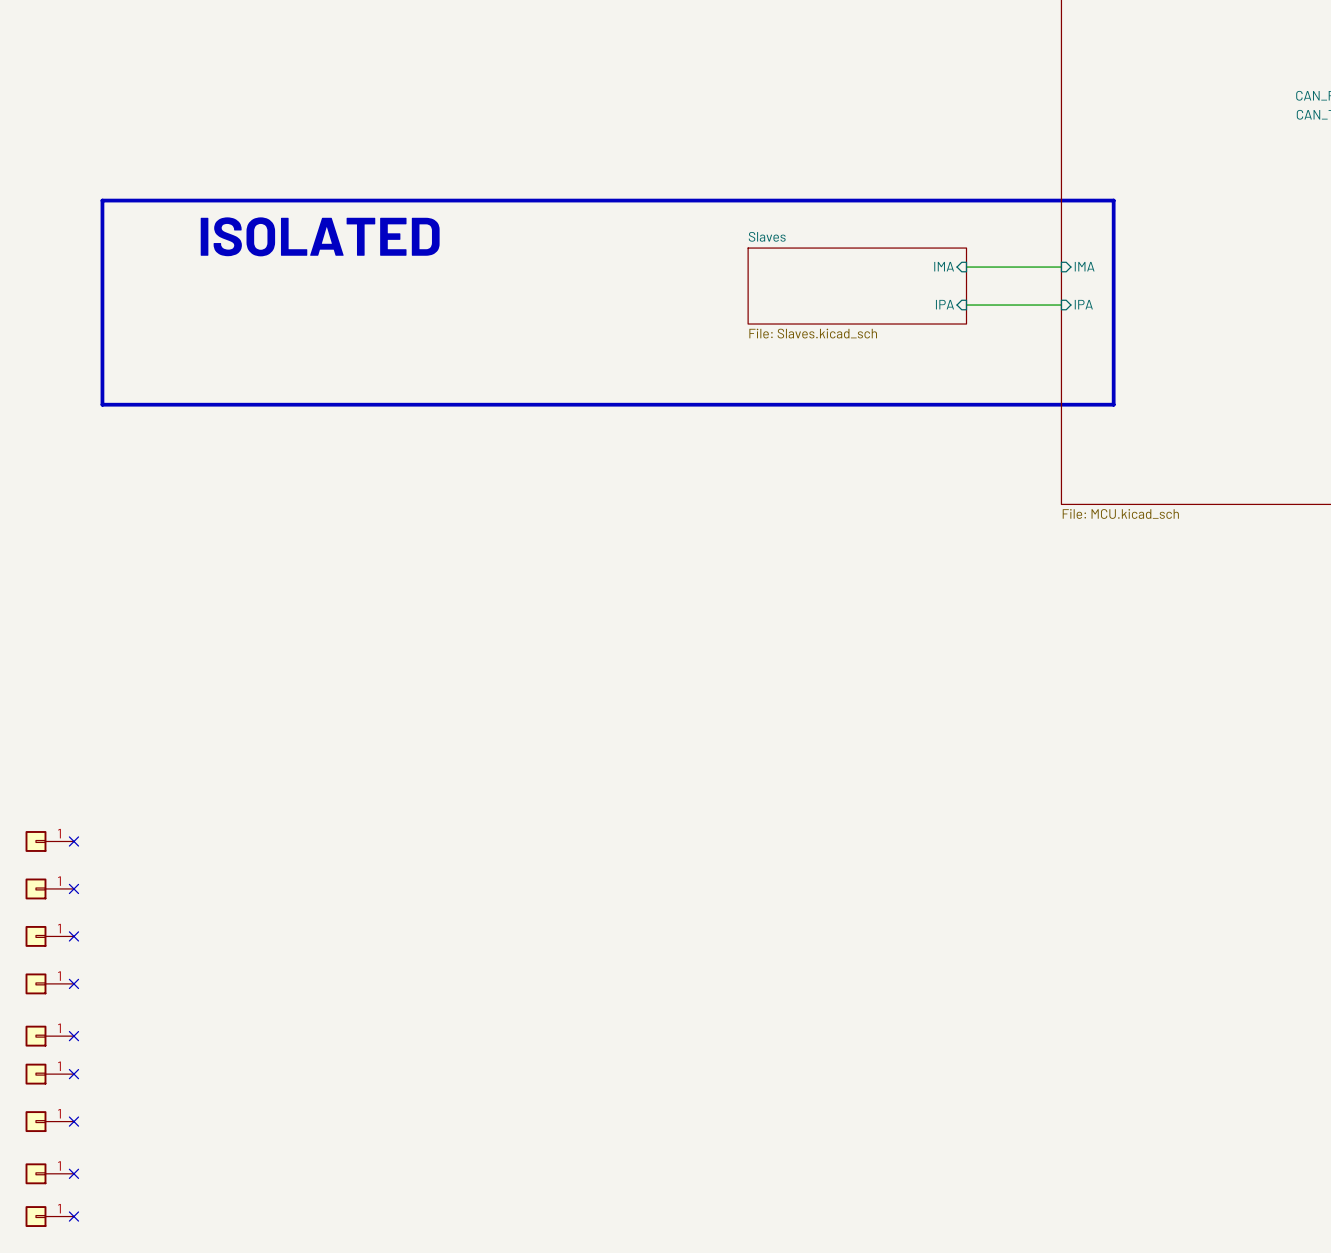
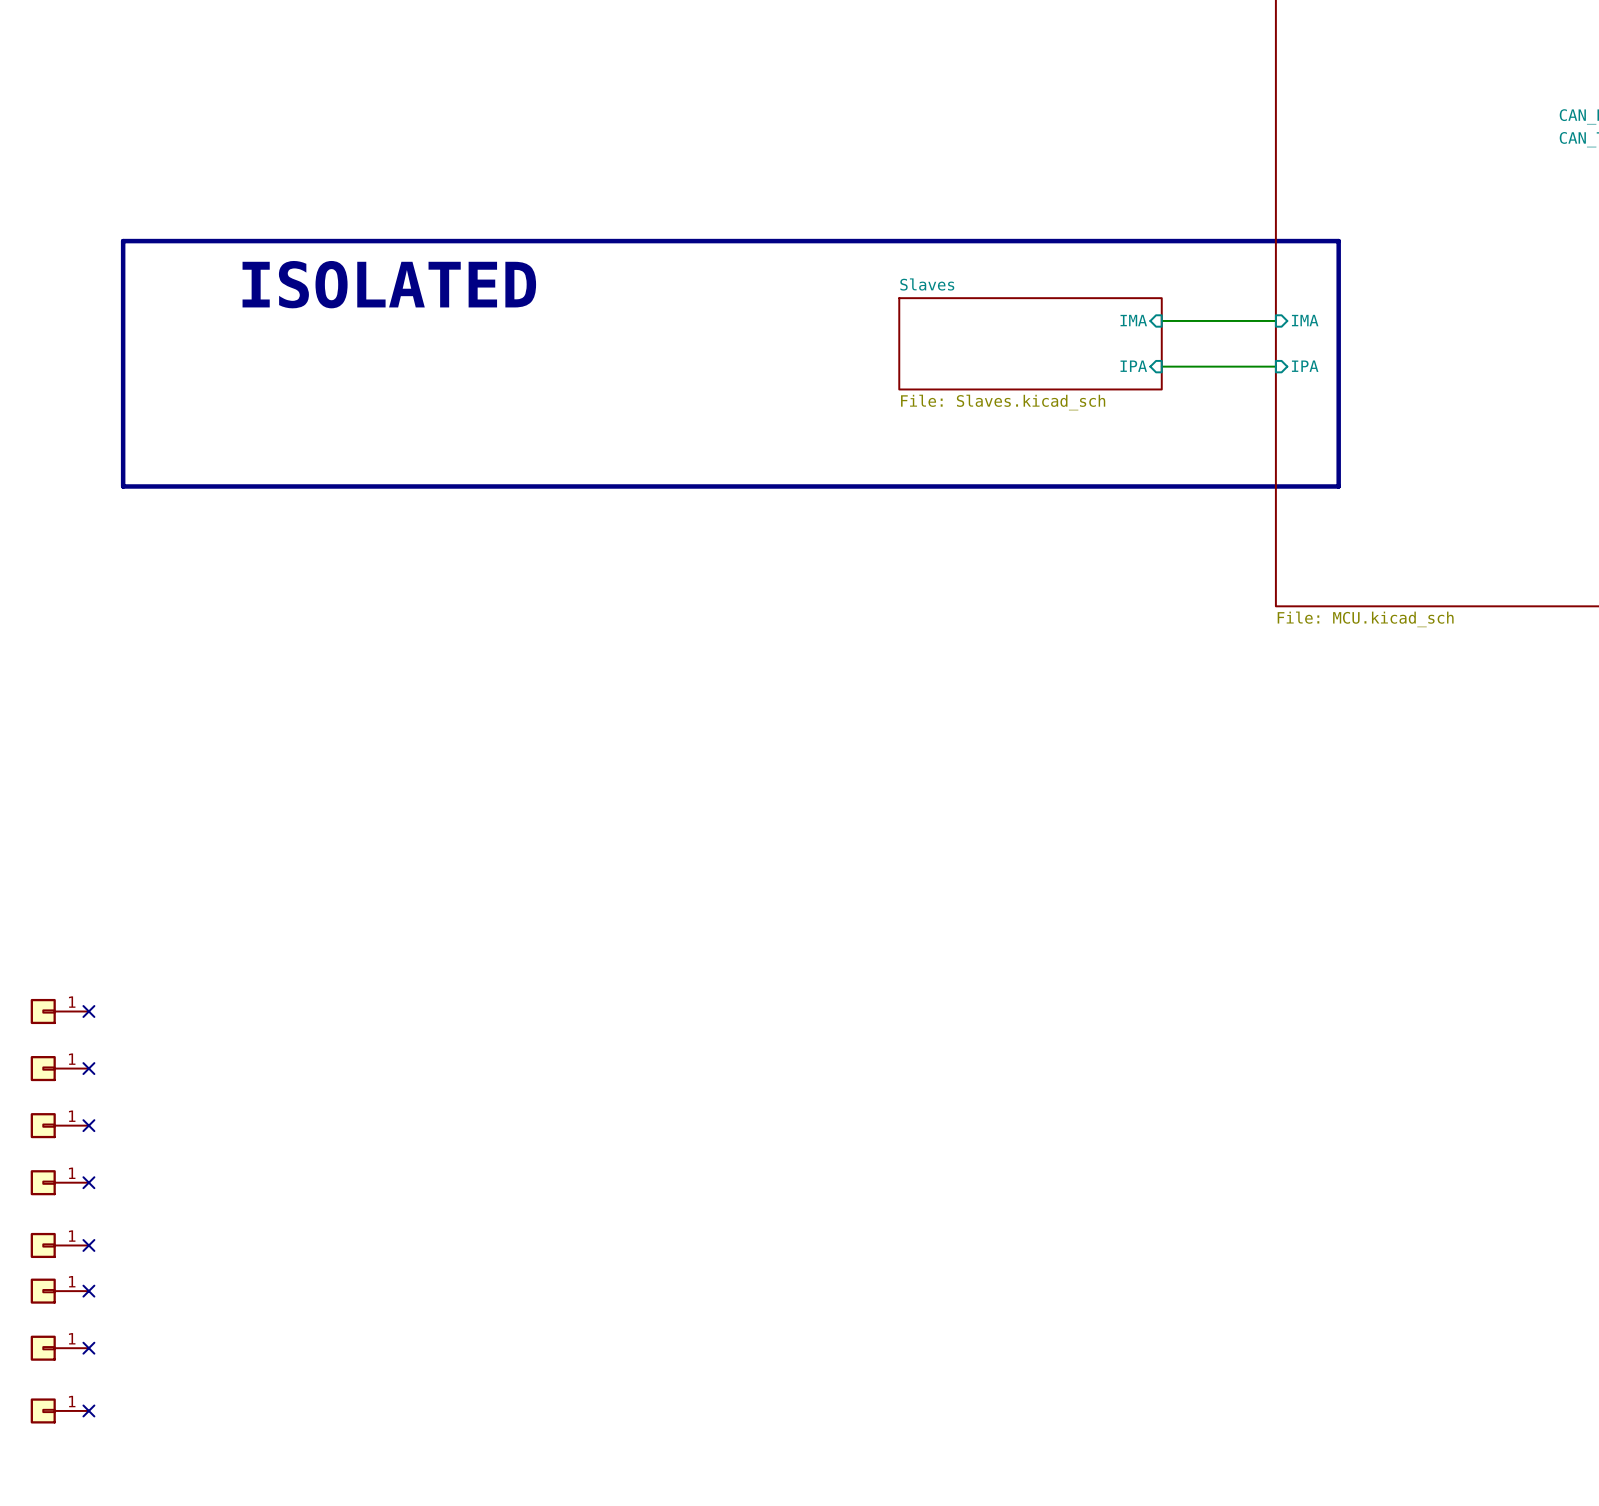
part: (49, 1216) -> none
no-connect mark: (73, 1216) -> none

